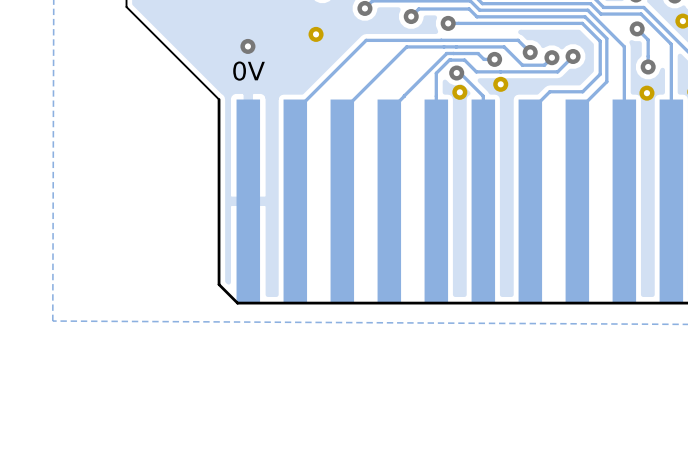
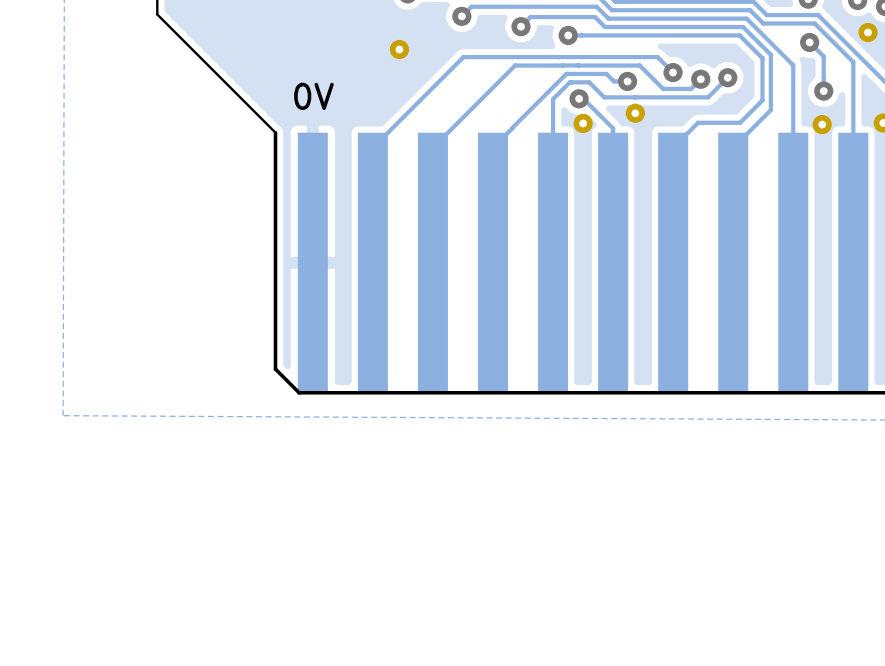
via: (247, 46) -> none

